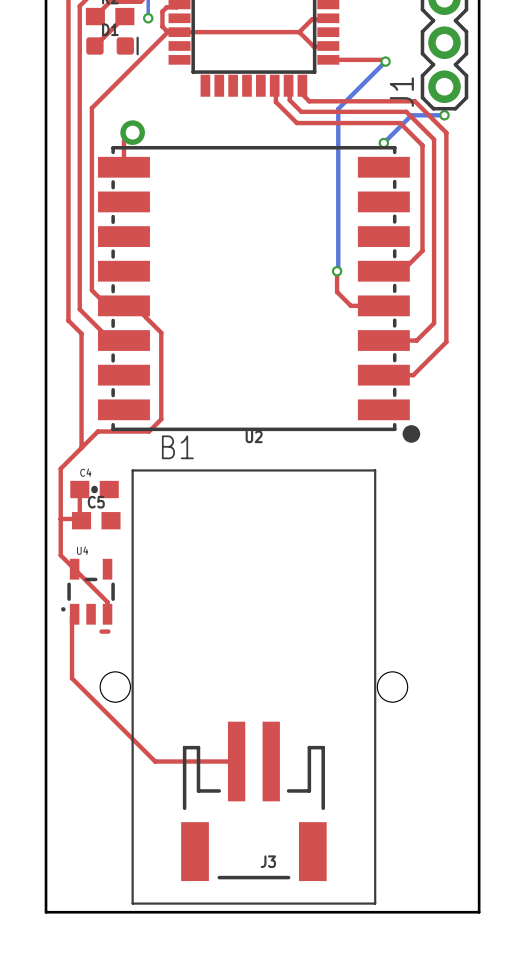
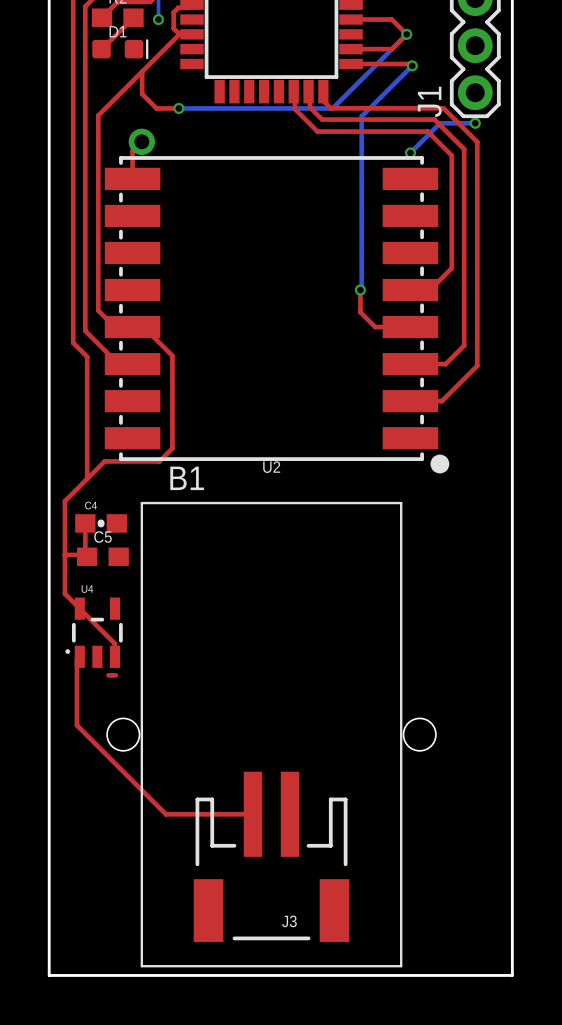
top track: none -> (351, 19) (391, 19) (406, 34) (391, 49) (351, 49)
top track: (327, 19) (312, 19) (299, 32) -> none
top track: (181, 32) (299, 32) -> none
top track: (299, 32) (313, 46) (327, 46) -> none
bottom track: none -> (406, 34) (332, 108) (178, 108)
via: none -> (406, 34)
top track: none -> (142, 71) (142, 93) (156, 108) (178, 108)
via: none -> (178, 108)

